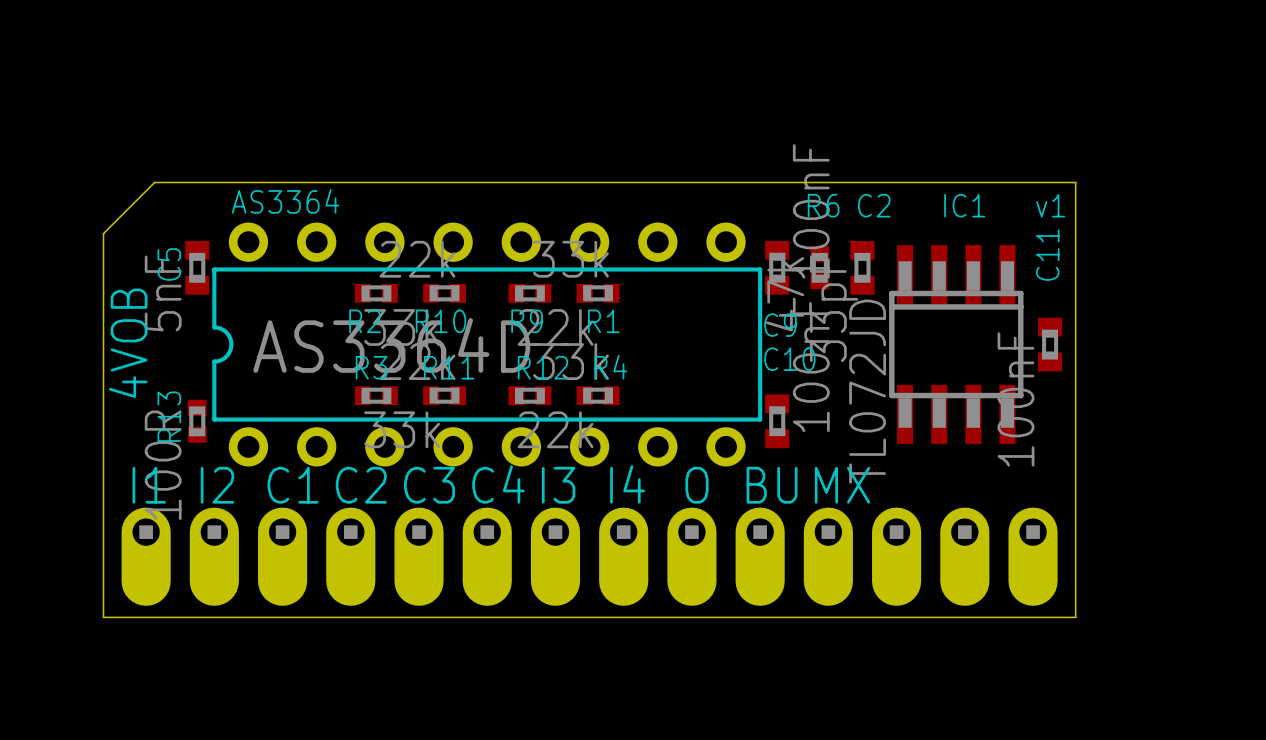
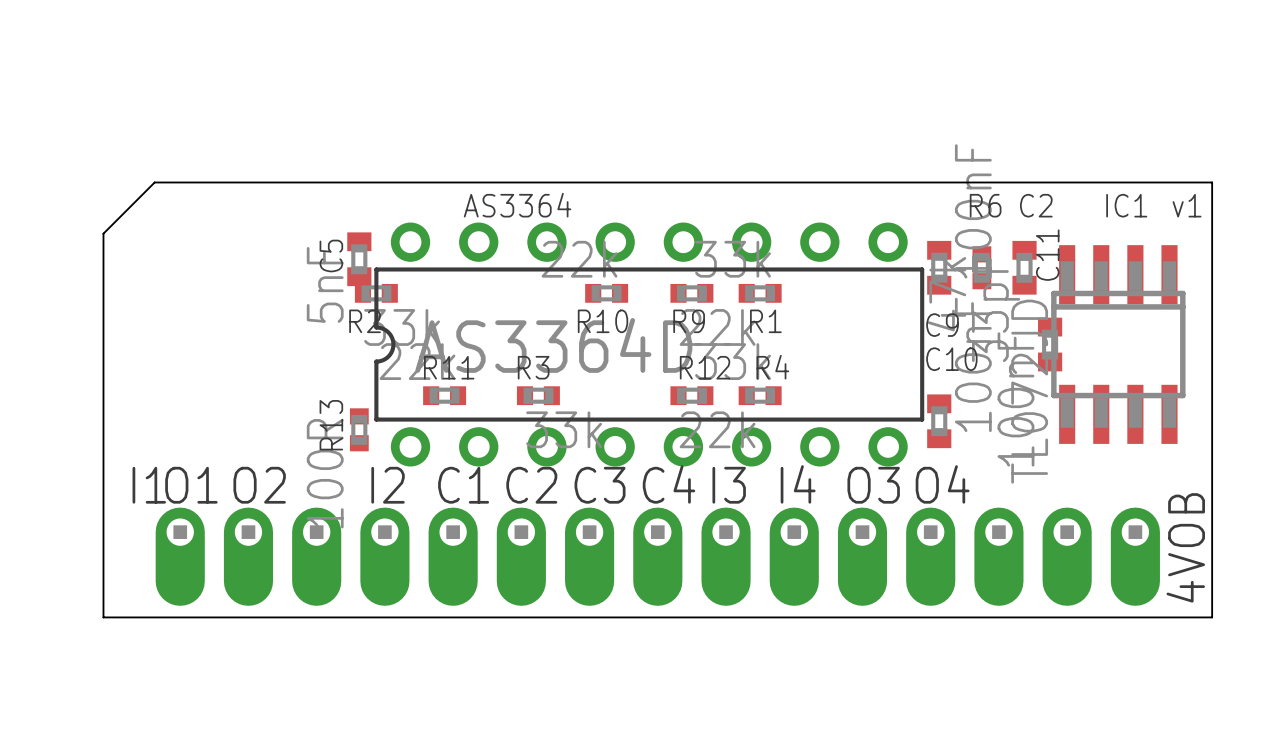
board edge: (1075, 182) (1075, 617) -> (1075, 182) (1212, 182) (1212, 617) (1075, 617)
text position: AS3364 (285, 201) -> AS3364 (517, 205)
text position: v1 (1050, 205) -> v1 (1187, 205)
C5 position: (197, 267) -> (359, 259)
C9 position: (777, 267) -> (939, 267)
R6 position: (819, 267) -> (981, 267)
C2 position: (862, 267) -> (1024, 267)
R10 position: (444, 293) -> (606, 293)
R9 position: (529, 293) -> (691, 293)
R1 position: (598, 293) -> (760, 293)
text: 4VOB (128, 343) -> none
part position: (487, 344) -> (649, 344)
IC1 position: (956, 344) -> (1118, 344)
R3 position: (376, 395) -> (538, 395)
R12 position: (529, 395) -> (691, 395)
R4 position: (598, 395) -> (760, 395)
R13 position: (197, 421) -> (359, 429)
C10 position: (777, 421) -> (939, 421)
text position: C4 (498, 484) -> C4 (668, 484)
text position: I4 (627, 484) -> I4 (798, 484)
text: none -> O4 (942, 484)
text: none -> O1 (191, 485)
text position: I2 (217, 485) -> I2 (388, 485)
text: none -> O2 (259, 485)
text position: C1 (293, 485) -> C1 (463, 485)
text position: C2 (361, 485) -> C2 (531, 485)
text position: C3 (429, 485) -> C3 (600, 485)
text position: I3 (558, 485) -> I3 (729, 485)
text: O (697, 485) -> none
text: BU (772, 485) -> none
text: MX (842, 485) -> none
text: none -> O3 (873, 485)
text: none -> 4VOB (1185, 547)
part: (146, 556) -> none
part: none -> (180, 556)
part: (214, 556) -> none
part: none -> (248, 556)
part: (282, 556) -> none
part: none -> (316, 556)
part: (350, 556) -> none
part: none -> (384, 556)
part: (419, 556) -> none
part: none -> (453, 556)
part: (487, 556) -> none
part: none -> (521, 556)
part: (555, 556) -> none
part: none -> (589, 556)
part: (623, 556) -> none
part: none -> (657, 556)
part: (691, 556) -> none
part: none -> (726, 556)
part: (760, 556) -> none
part: none -> (794, 556)
part: (828, 556) -> none
part: none -> (862, 556)
part: (896, 556) -> none
part: none -> (930, 556)
part: (964, 556) -> none
part: none -> (998, 556)
part: (1033, 556) -> none
part: none -> (1067, 556)
part: none -> (1135, 556)

